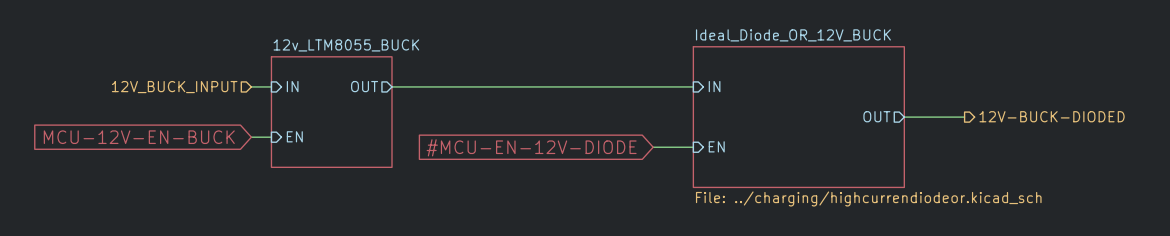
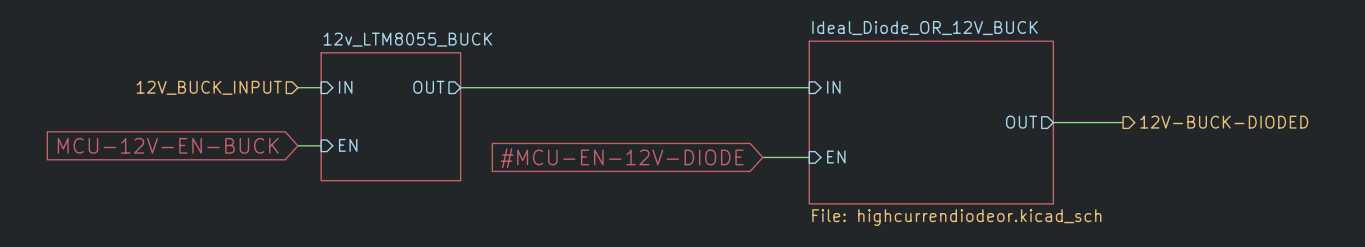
sheet Ideal_Diode_OR_12V_BUCK value: File: ../charging/highcurrendiodeor.kicad_sch (868, 198) -> File: highcurrendiodeor.kicad_sch (956, 217)

